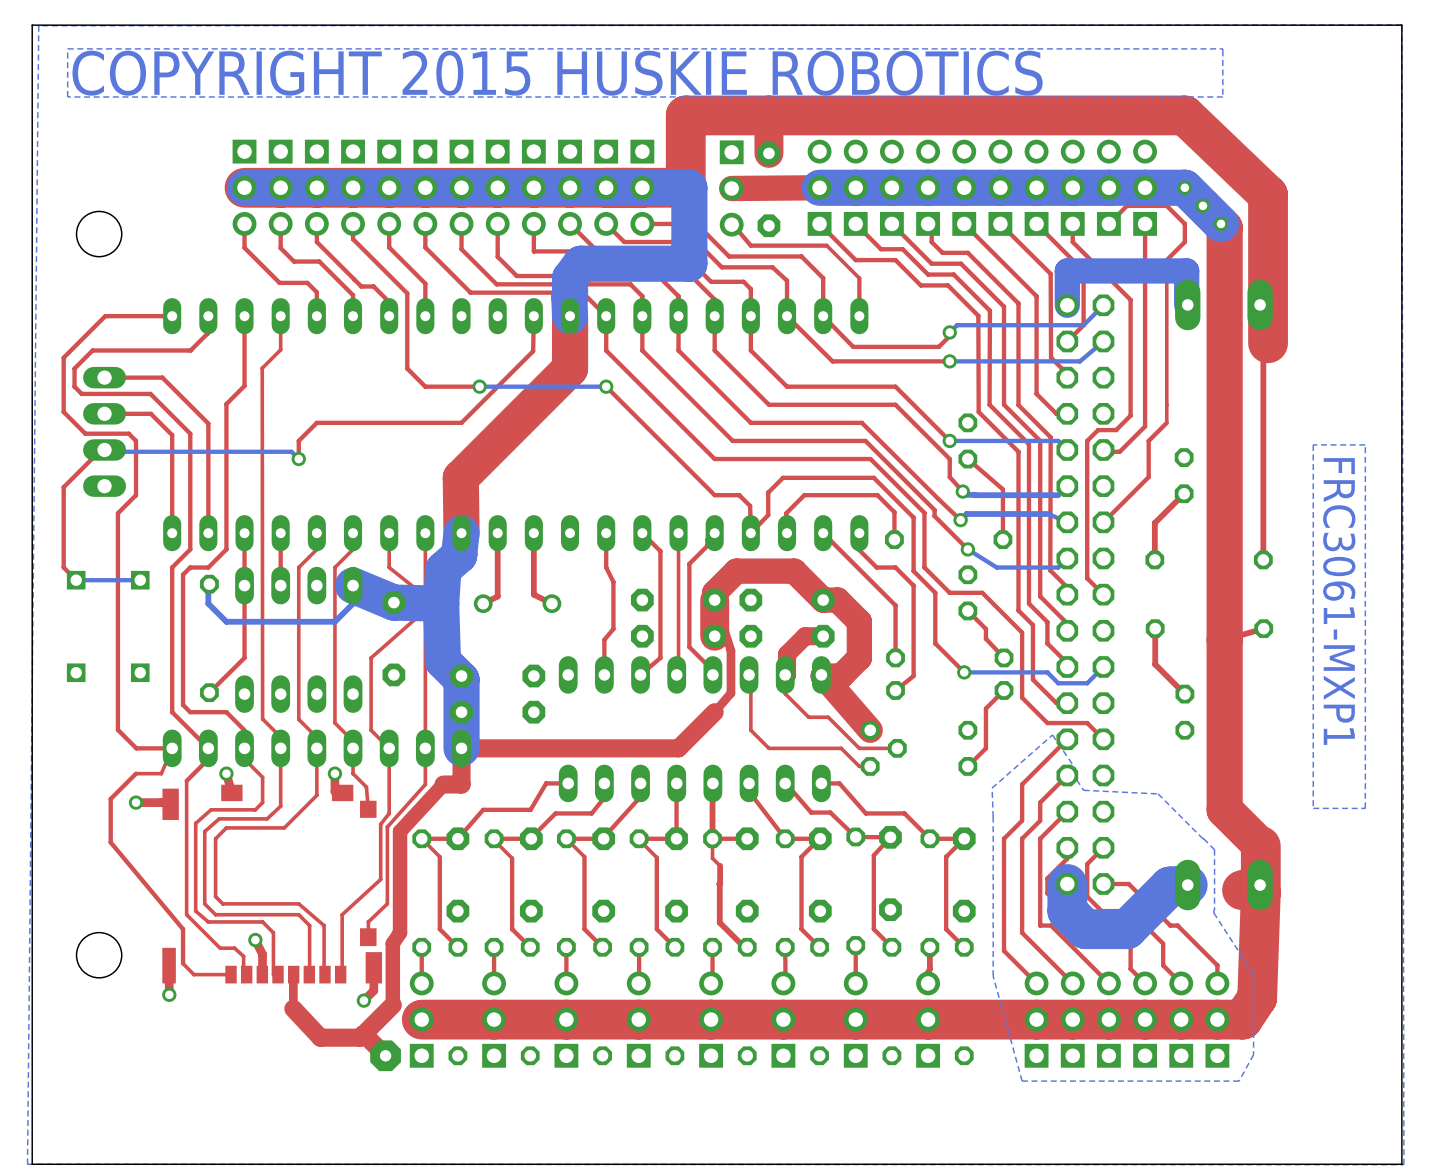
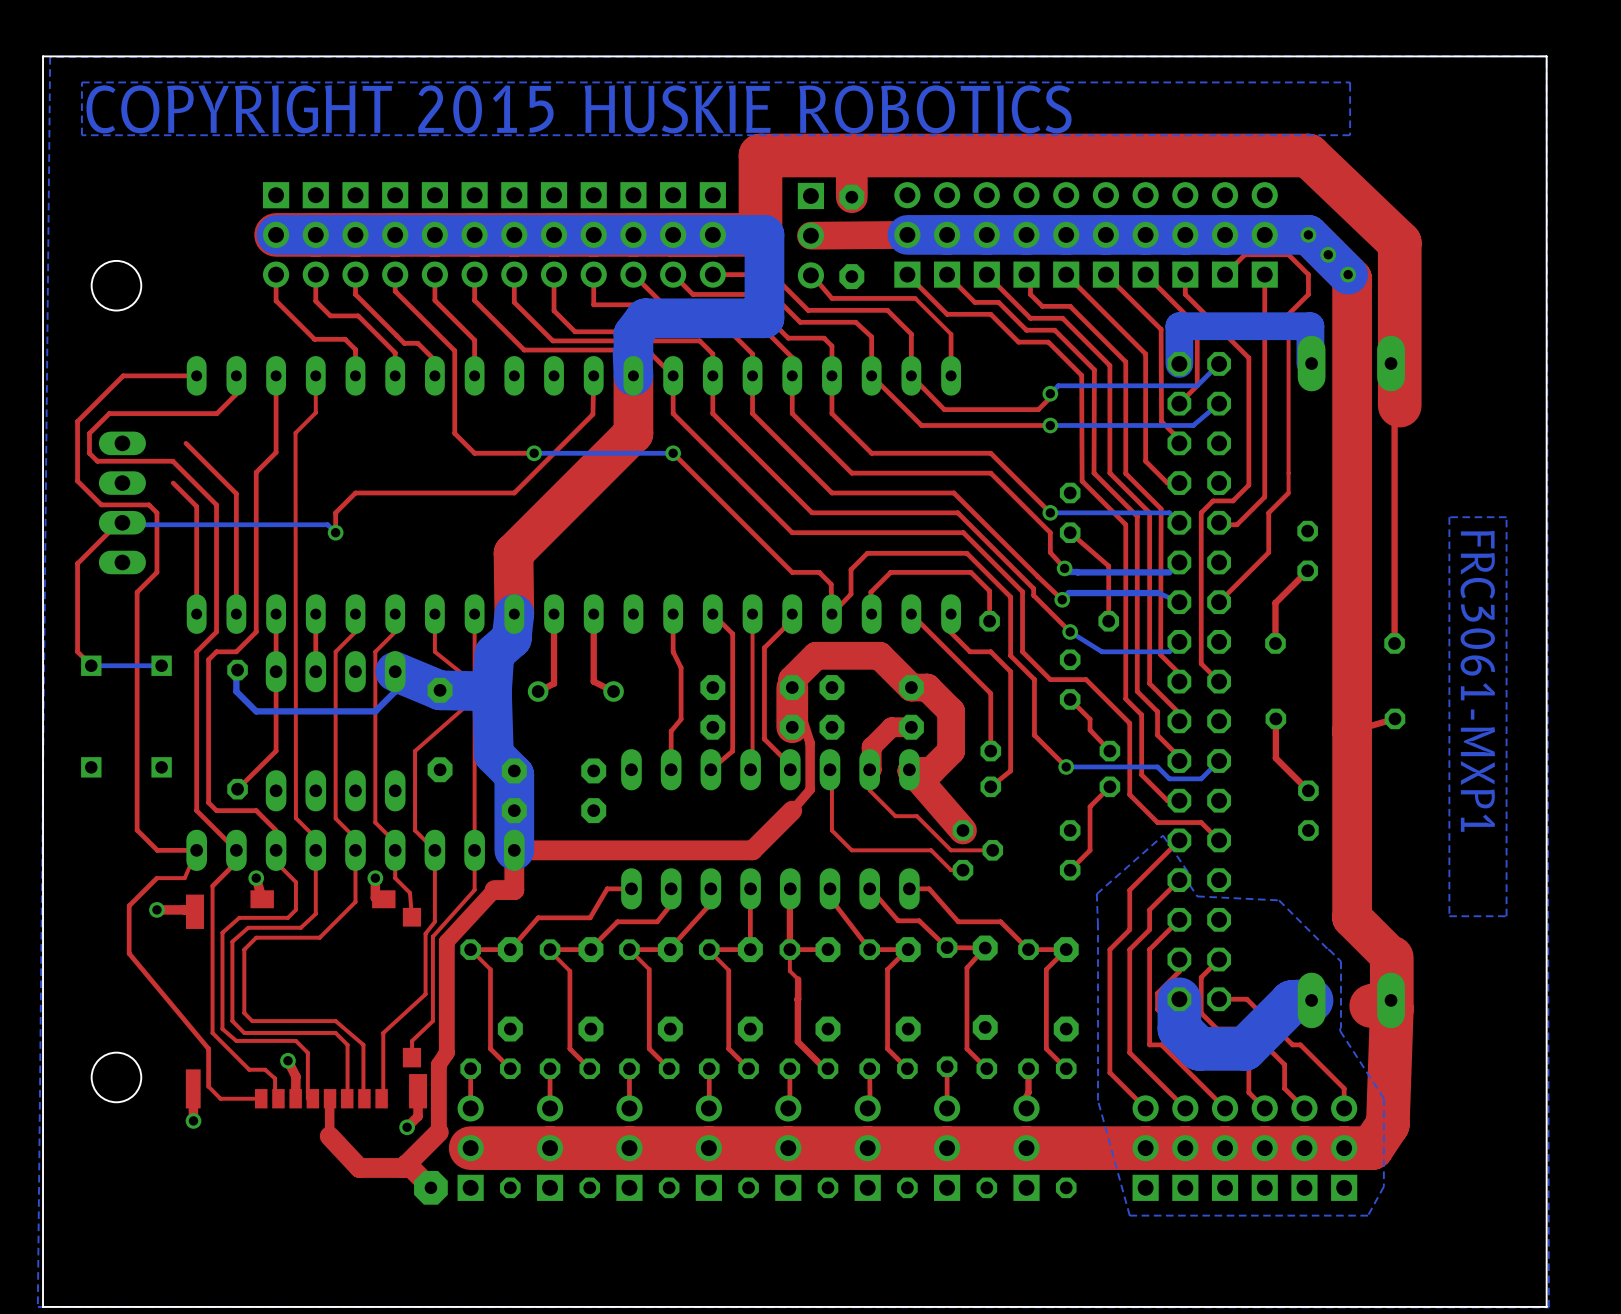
top track: (162, 377) (102, 377) -> none
top track: (150, 413) (104, 413) -> none

